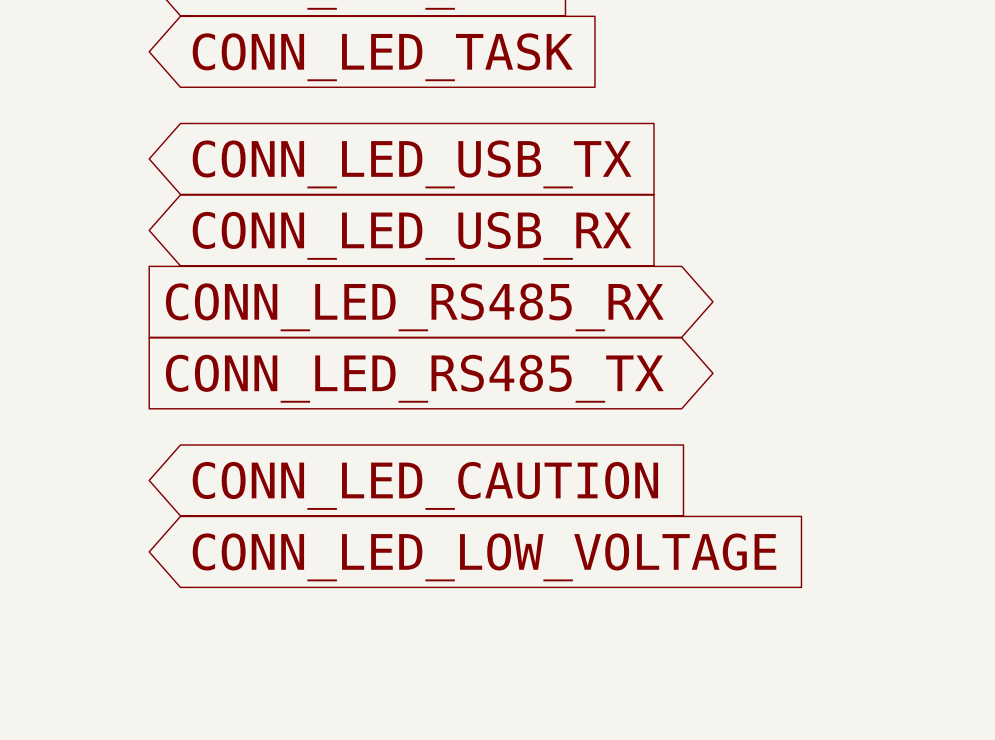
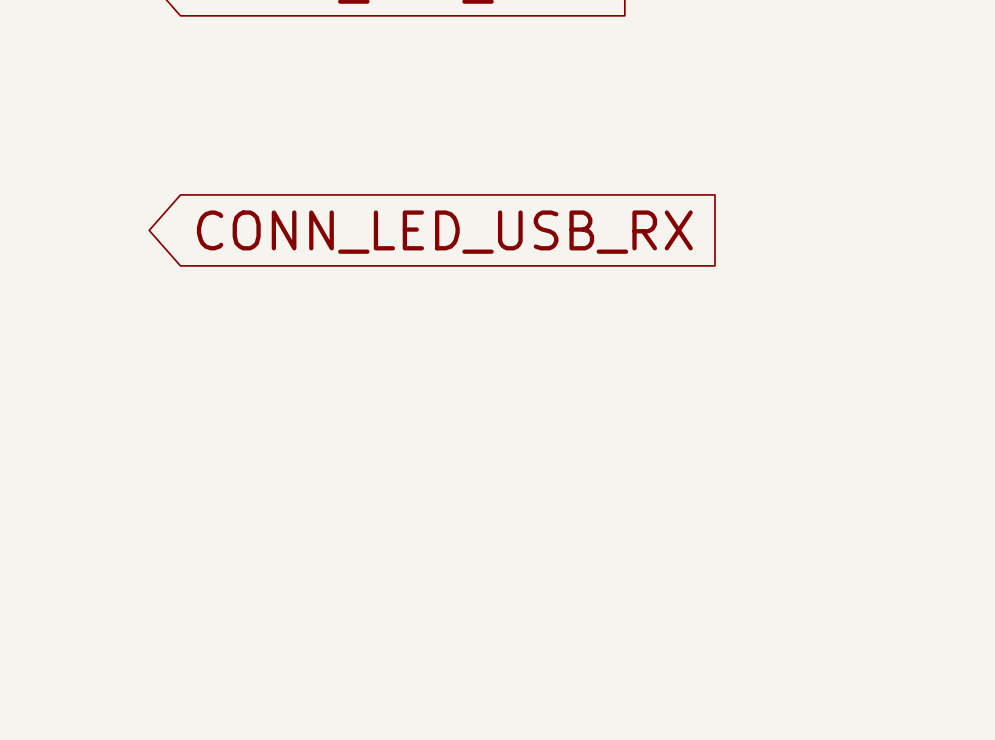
global label: CONN_LED_TASK (382, 57) -> none
global label: CONN_LED_USB_TX (412, 164) -> none
global label: CONN_LED_RS485_RX (414, 307) -> none
global label: CONN_LED_RS485_TX (414, 378) -> none
global label: CONN_LED_CAUTION (425, 485) -> none
global label: CONN_LED_LOW_VOLTAGE (484, 557) -> none

